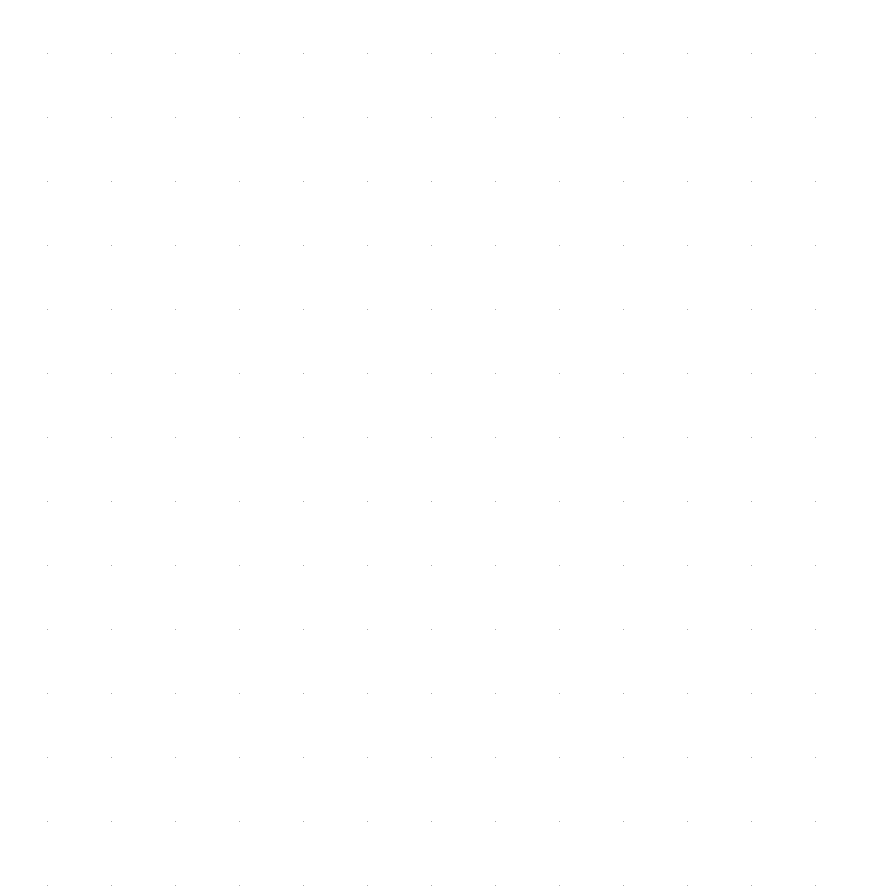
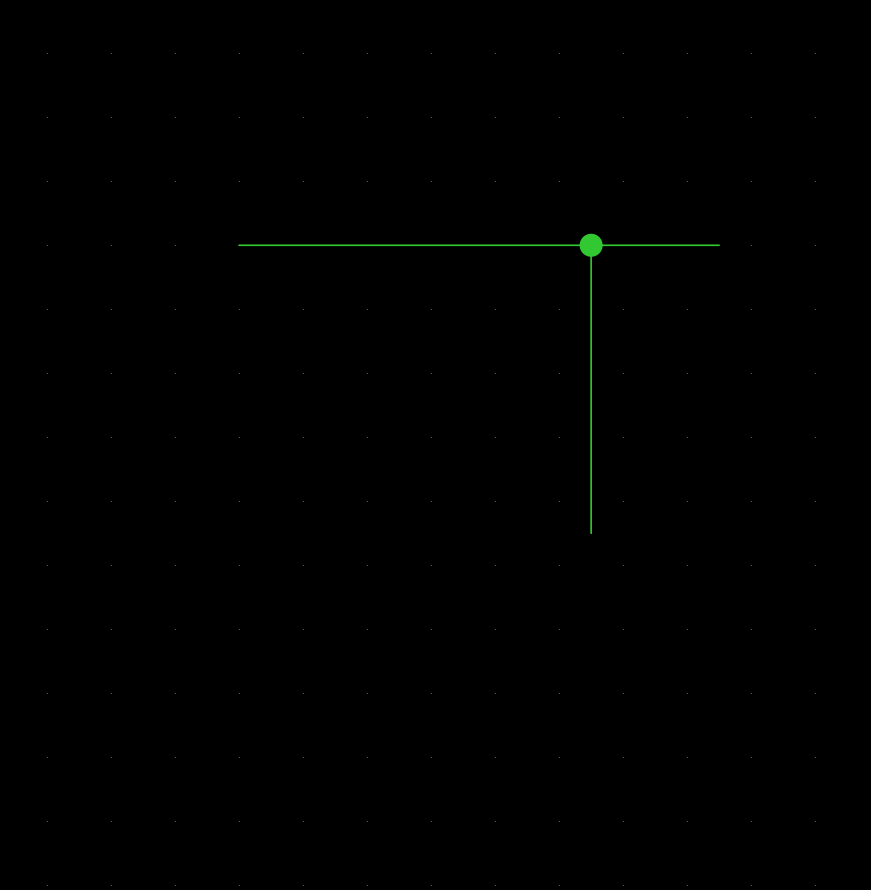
wire: none -> (239, 245) (719, 245)
wire: none -> (591, 245) (591, 533)
junction: none -> (591, 245)

